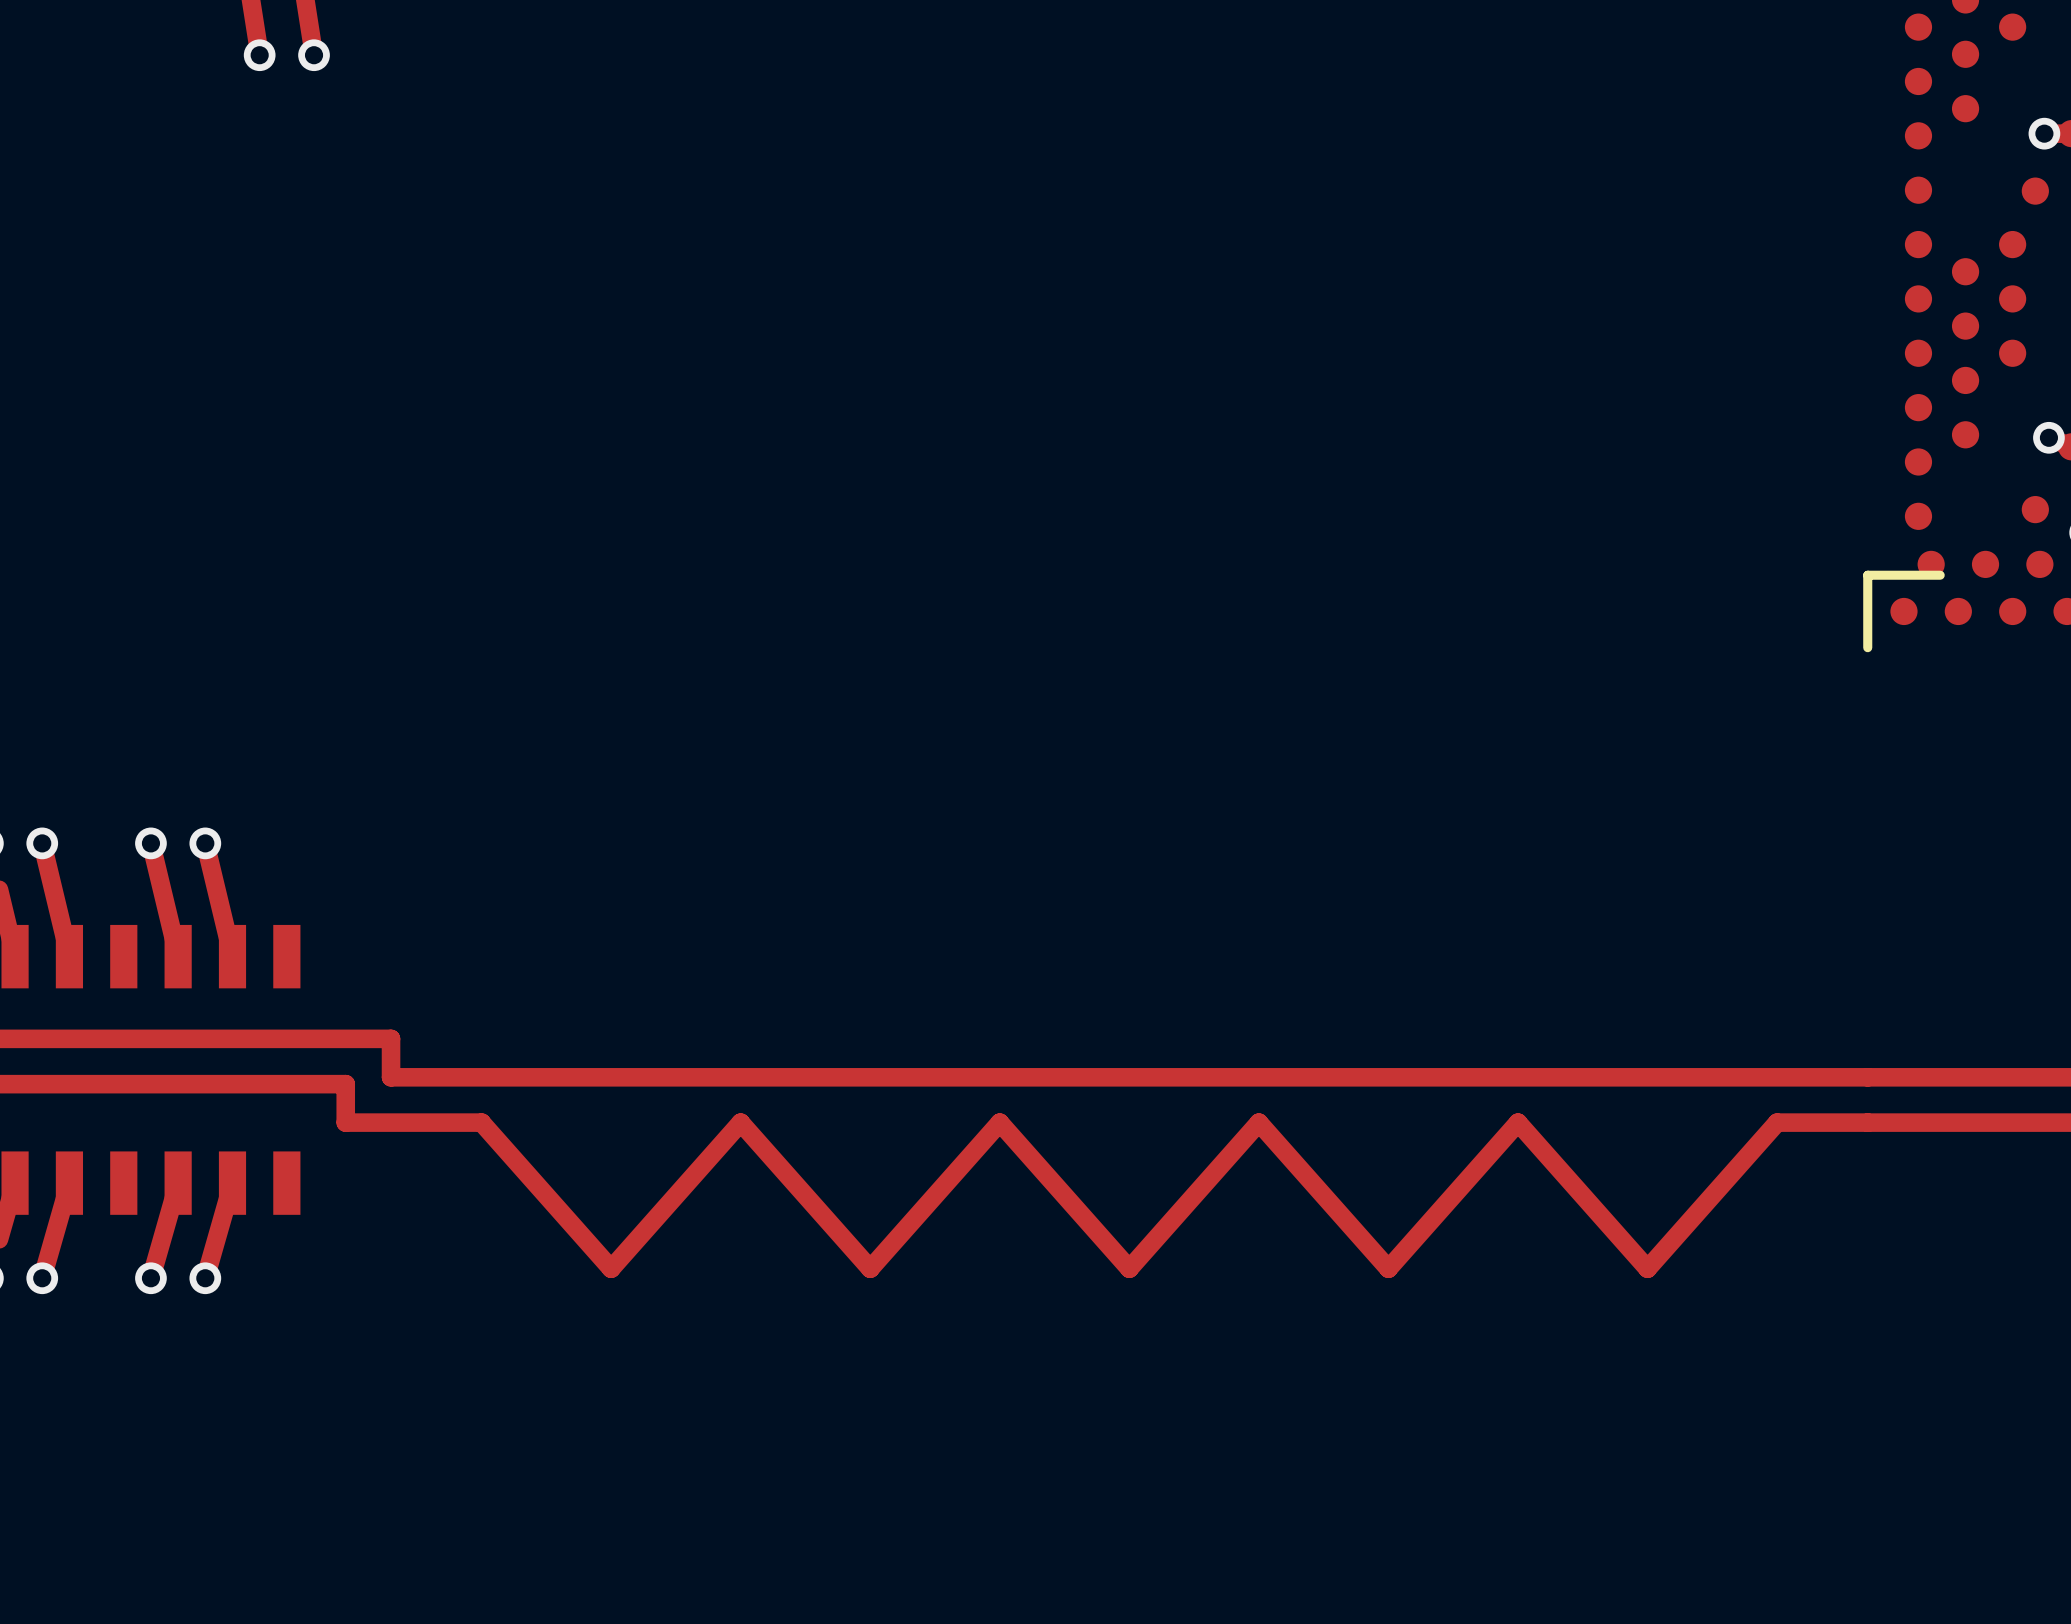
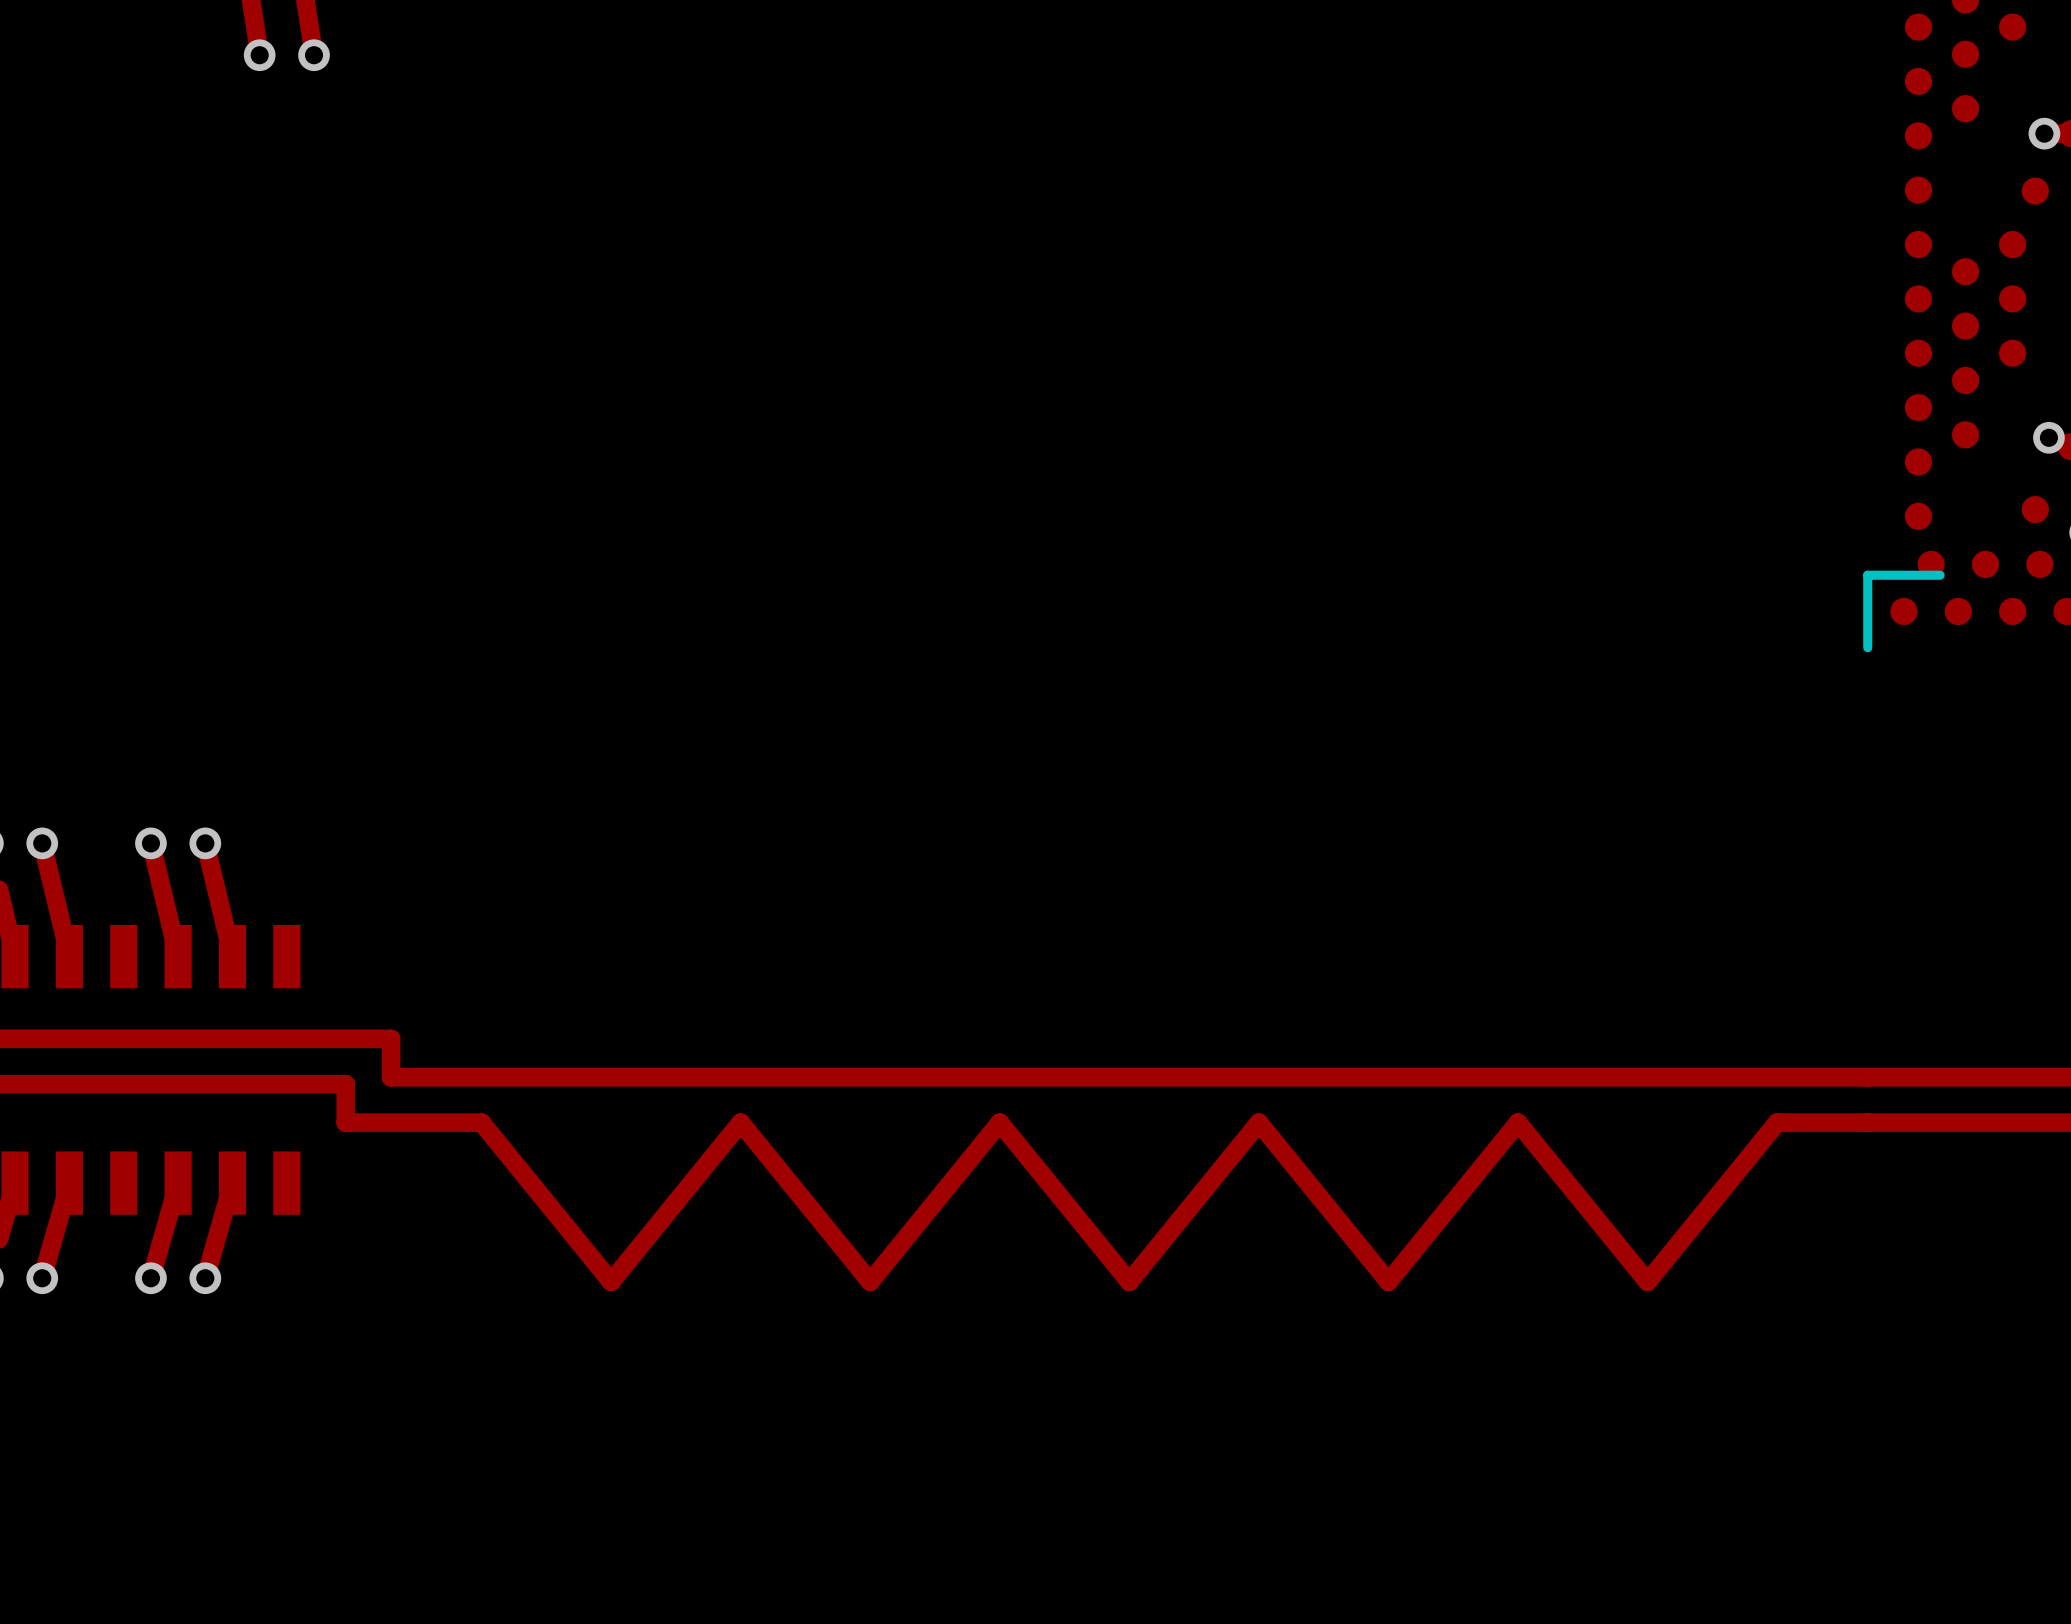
track: (481, 1122) (611, 1268) (740, 1122) (870, 1268) (999, 1122) (1129, 1268) (1258, 1122) (1388, 1268) (1518, 1122) (1647, 1268) (1777, 1122) -> (481, 1122) (611, 1281) (740, 1122) (870, 1281) (999, 1122) (1129, 1281) (1258, 1122) (1388, 1281) (1518, 1122) (1647, 1281) (1777, 1122)

